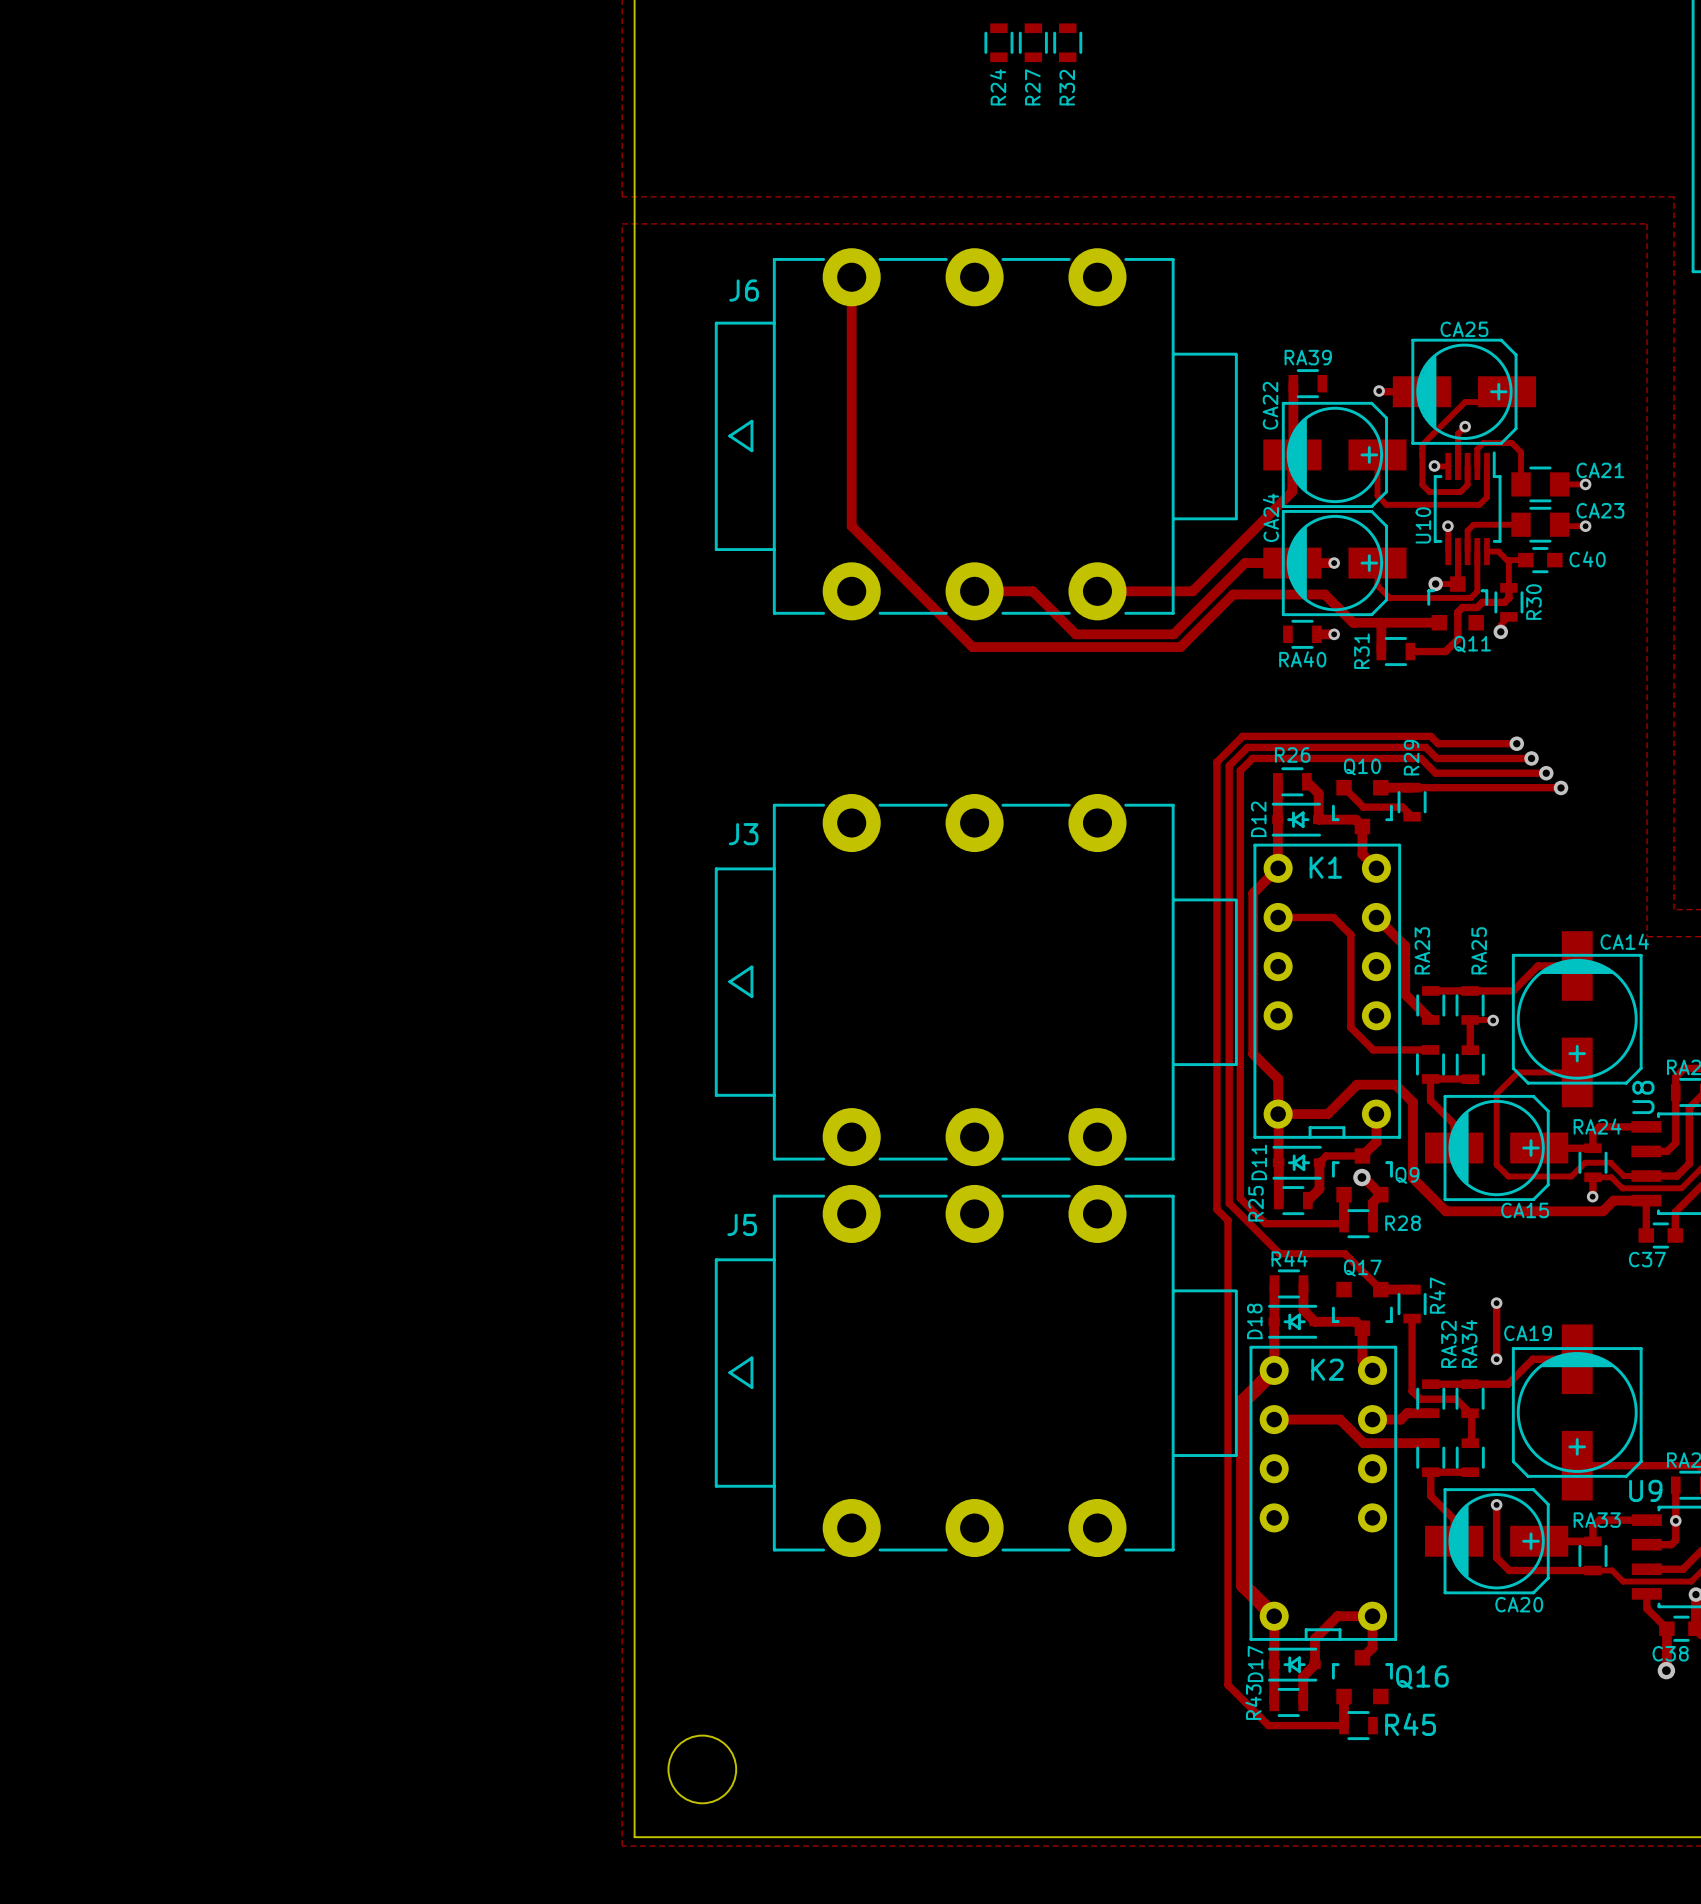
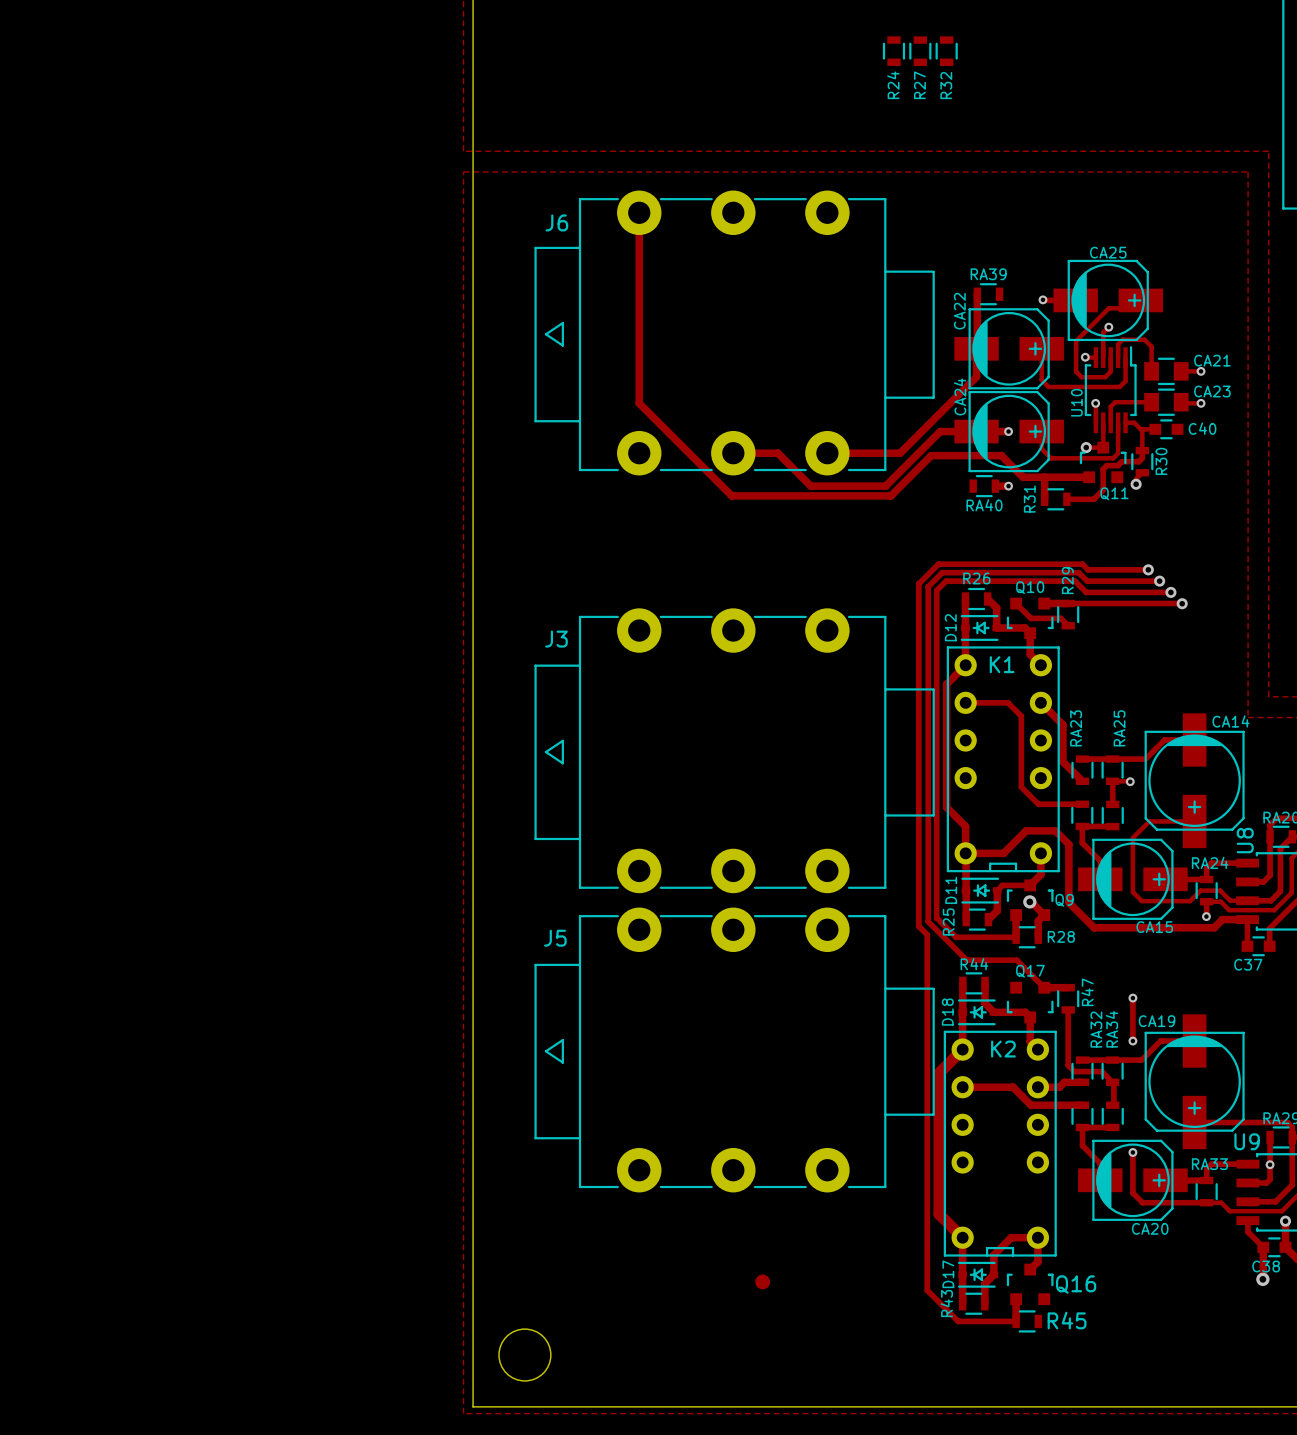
R24 position: (998, 42) -> (893, 51)
R27 position: (1033, 42) -> (920, 51)
R32 position: (1067, 42) -> (946, 51)
part: none -> (762, 1281)

